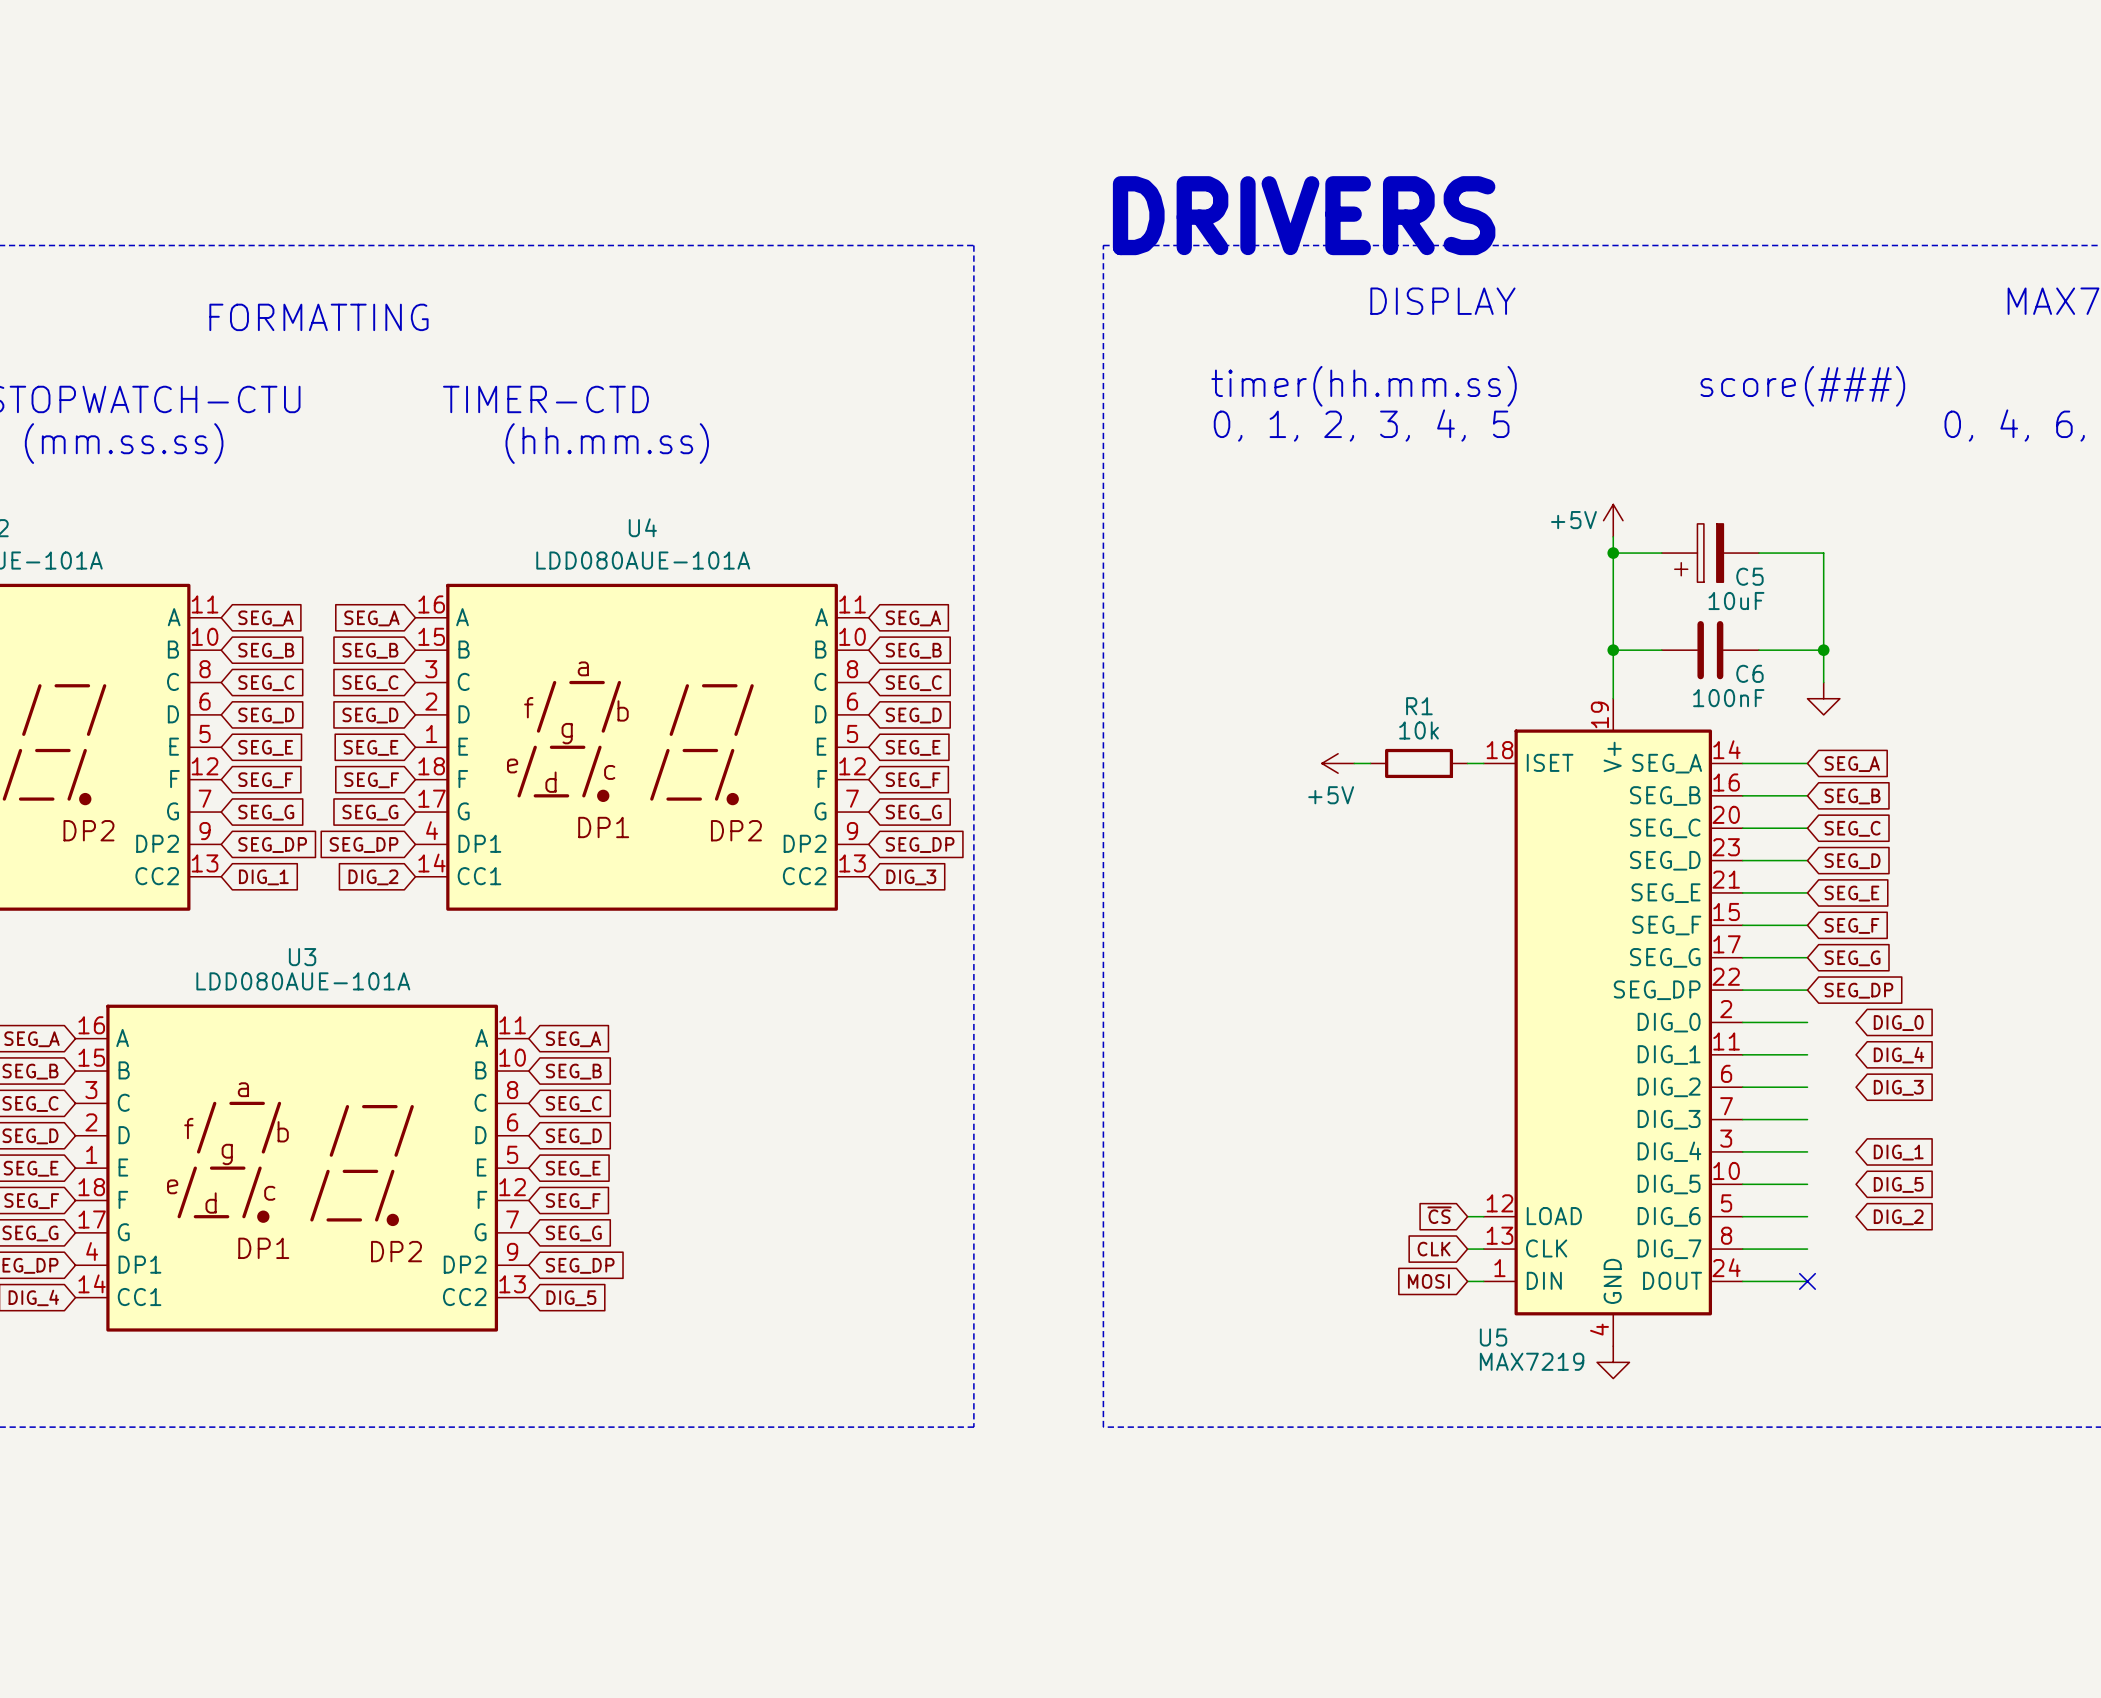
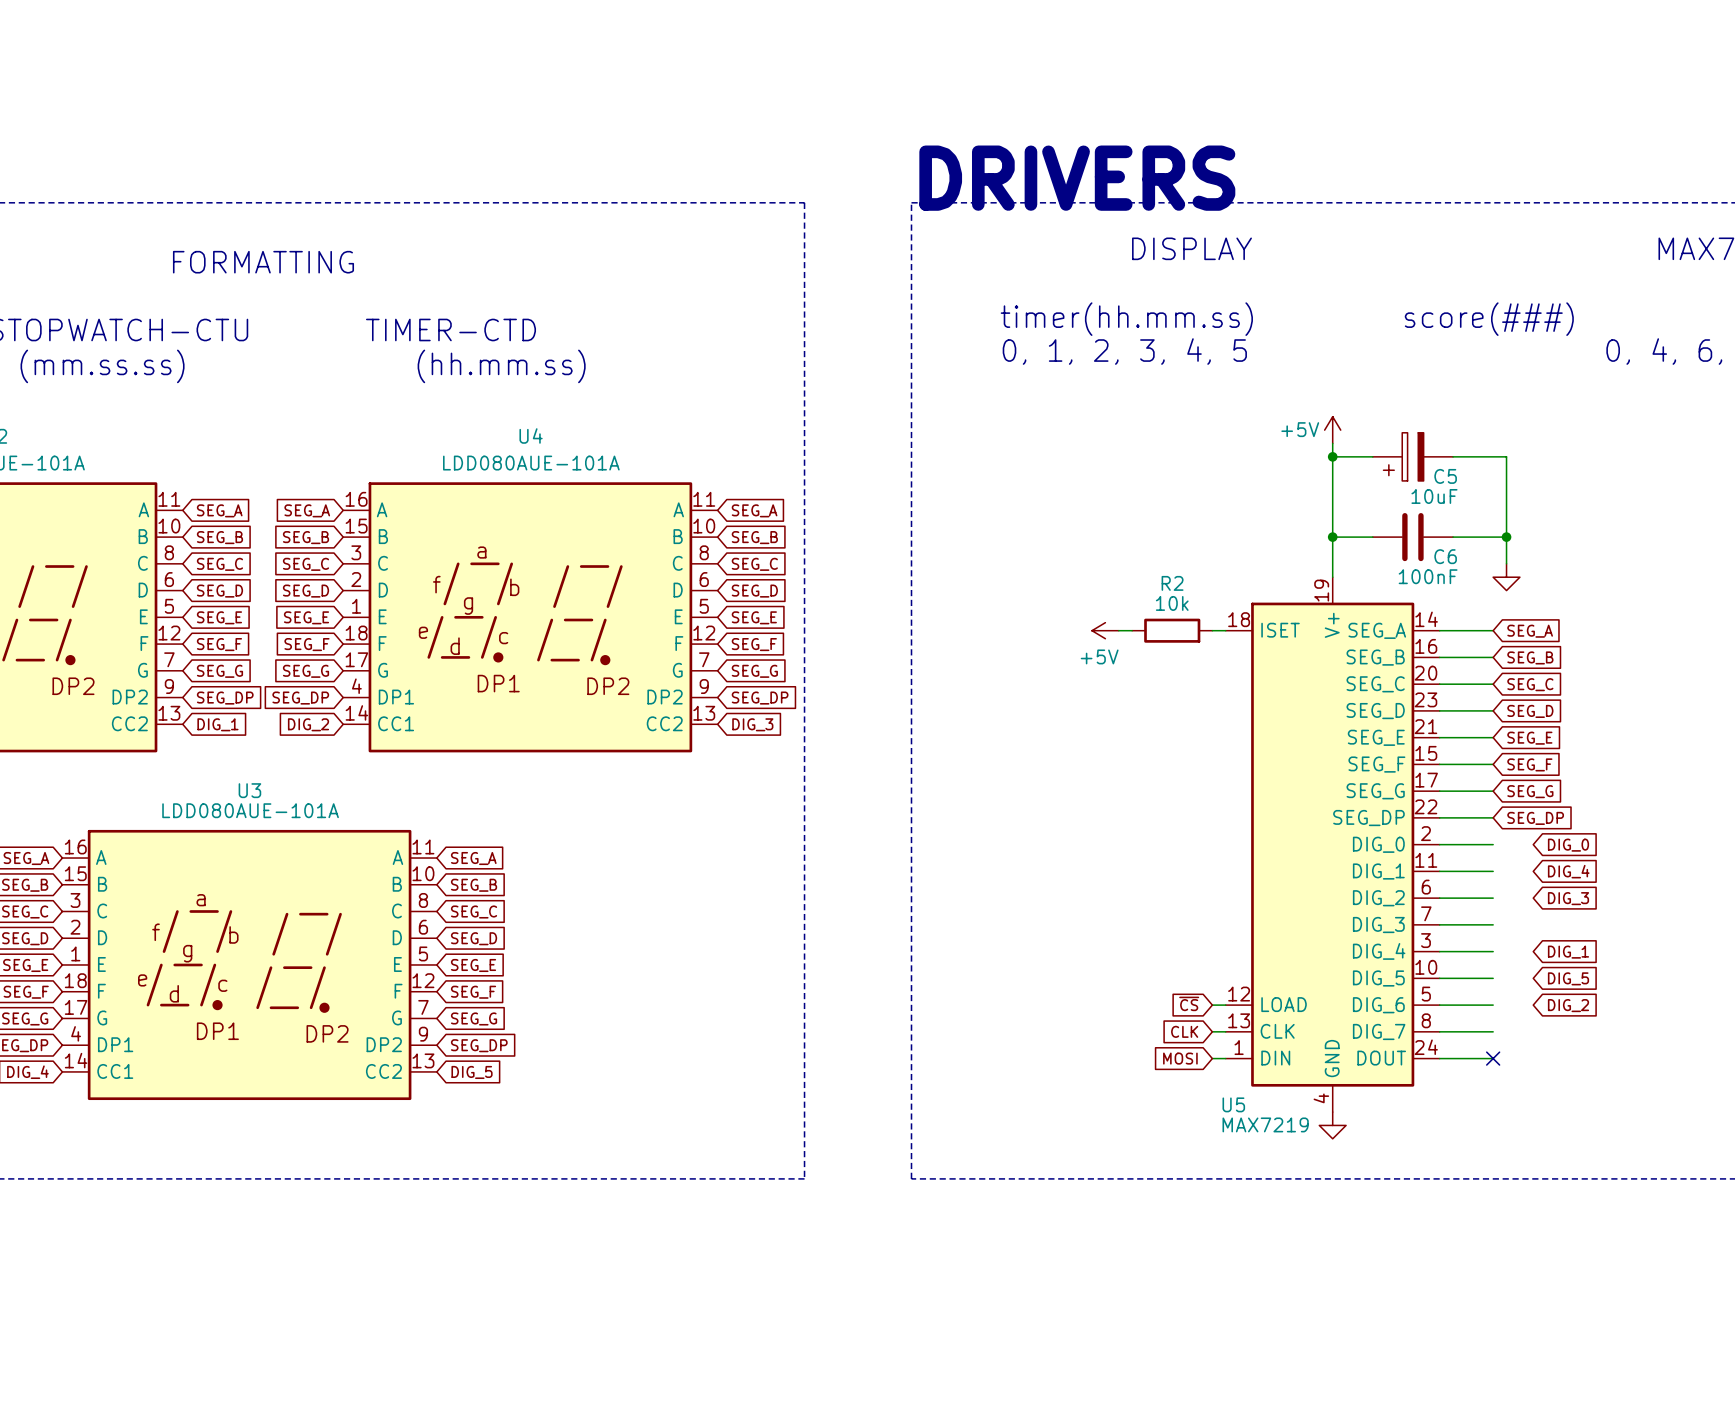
R1 name: R1 (1419, 706) -> R2 (1172, 583)

